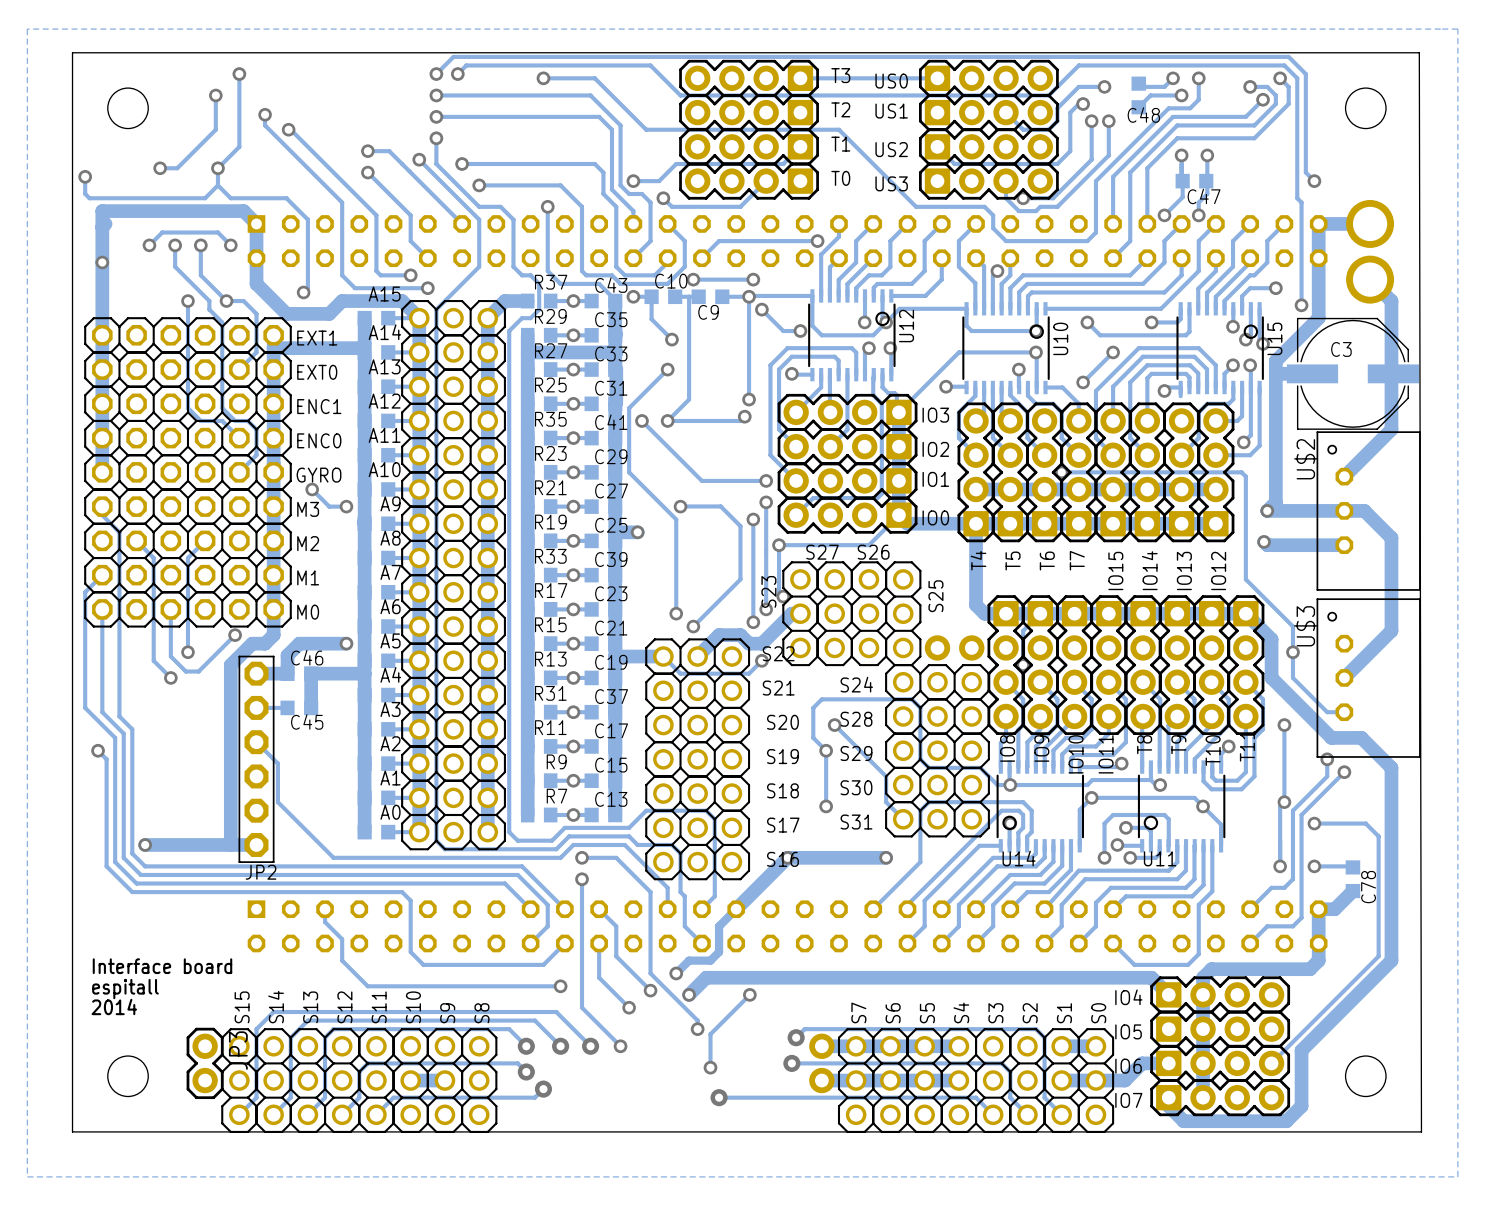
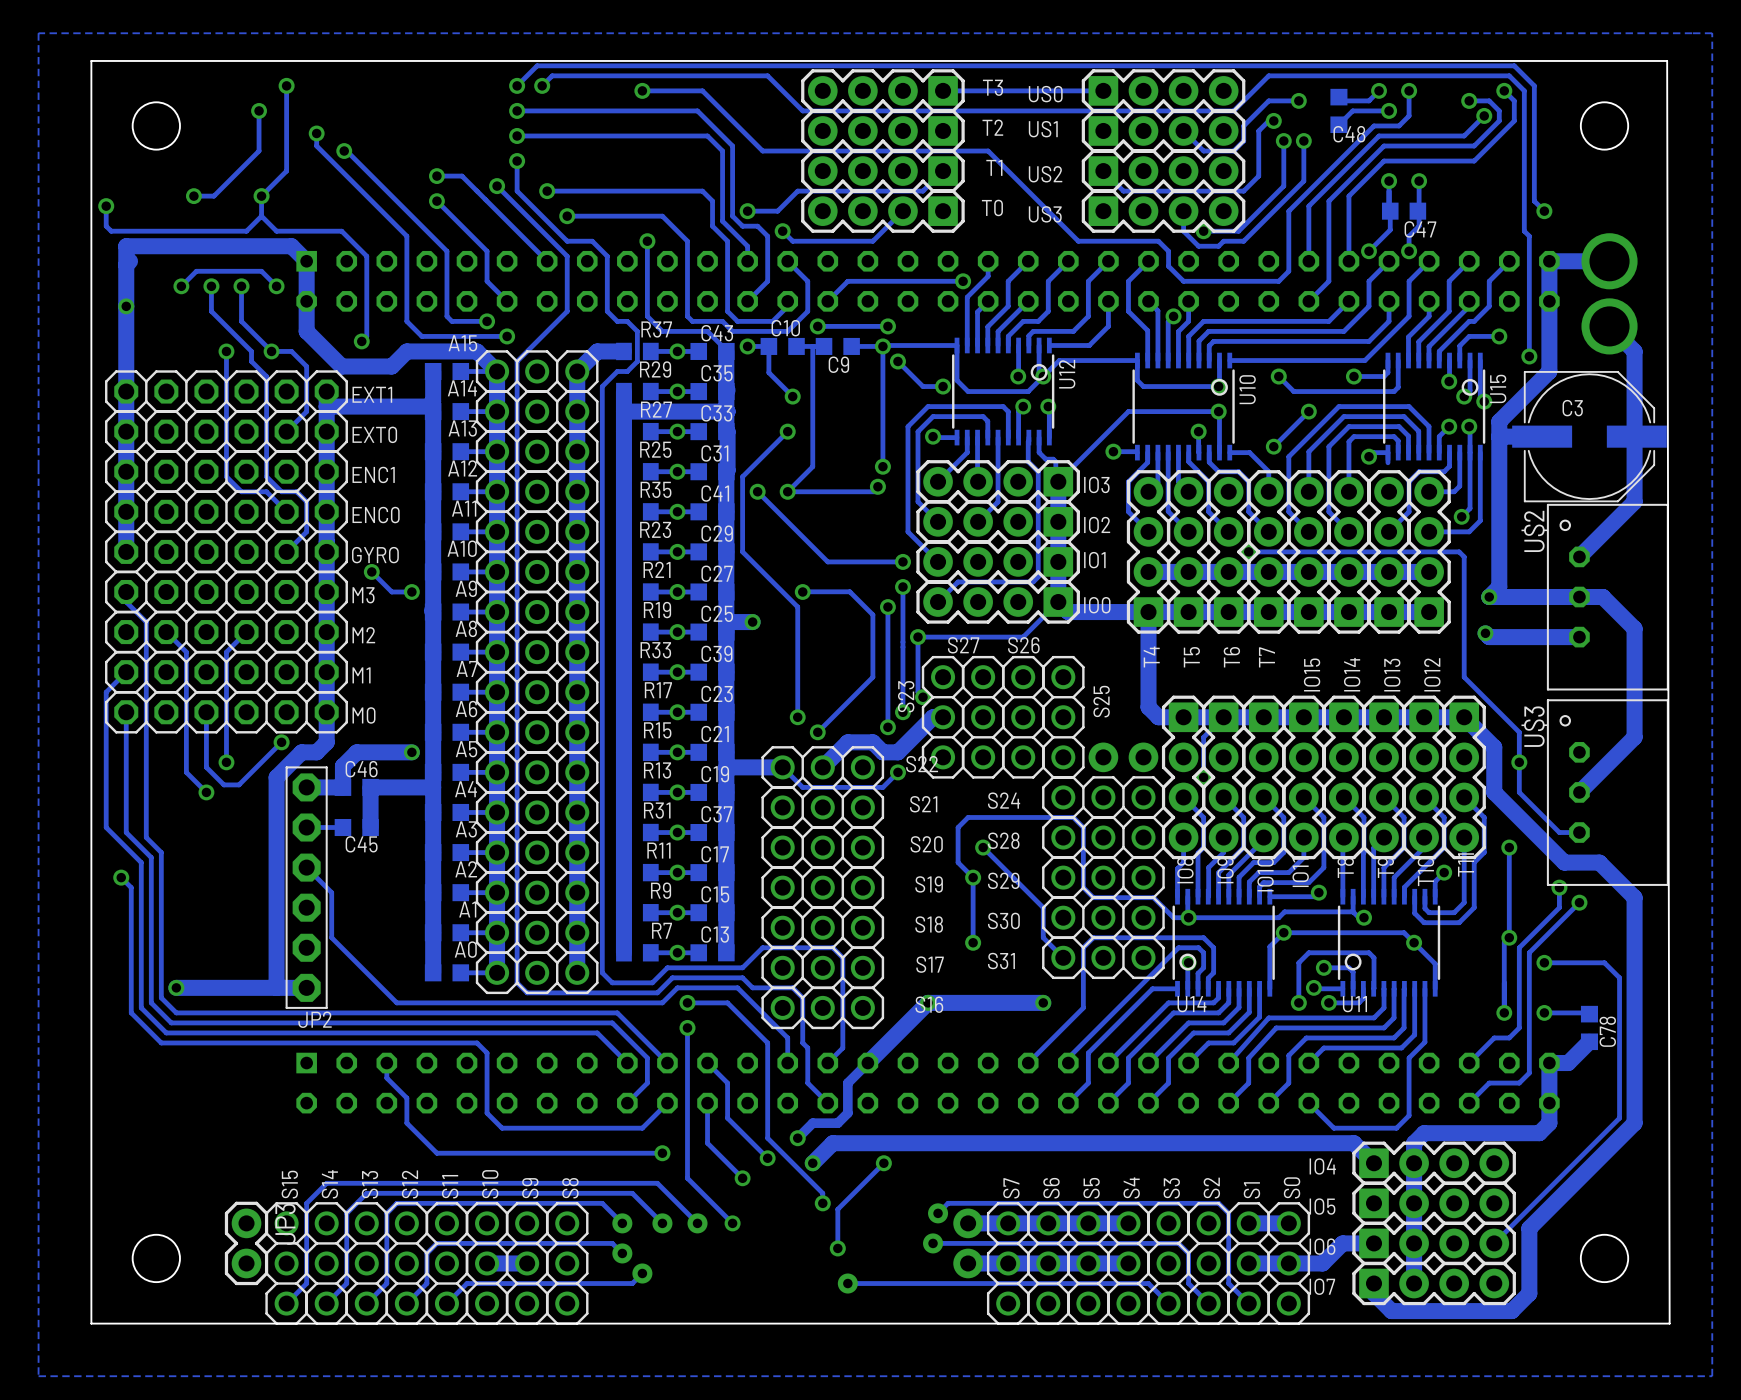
text: Interface board (162, 966) -> none
text: espitall (125, 989) -> none
text: 2014 (114, 1006) -> none

